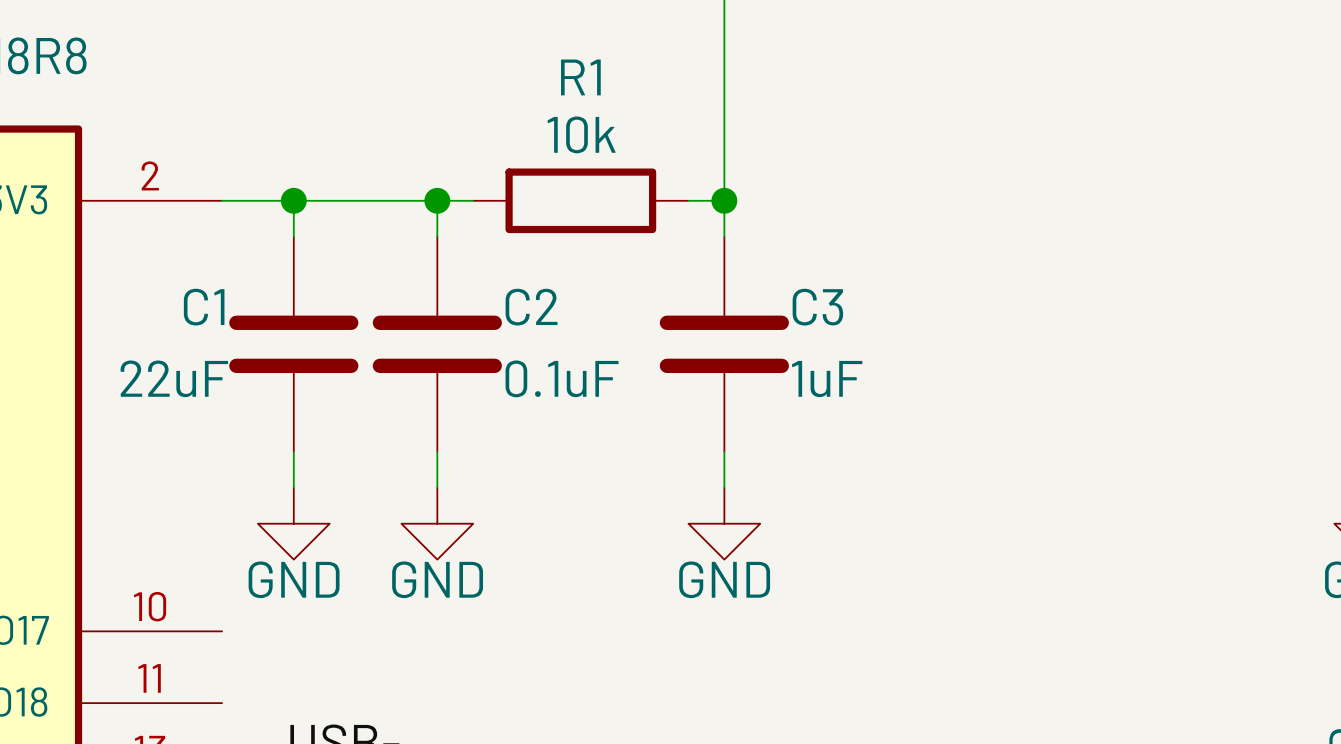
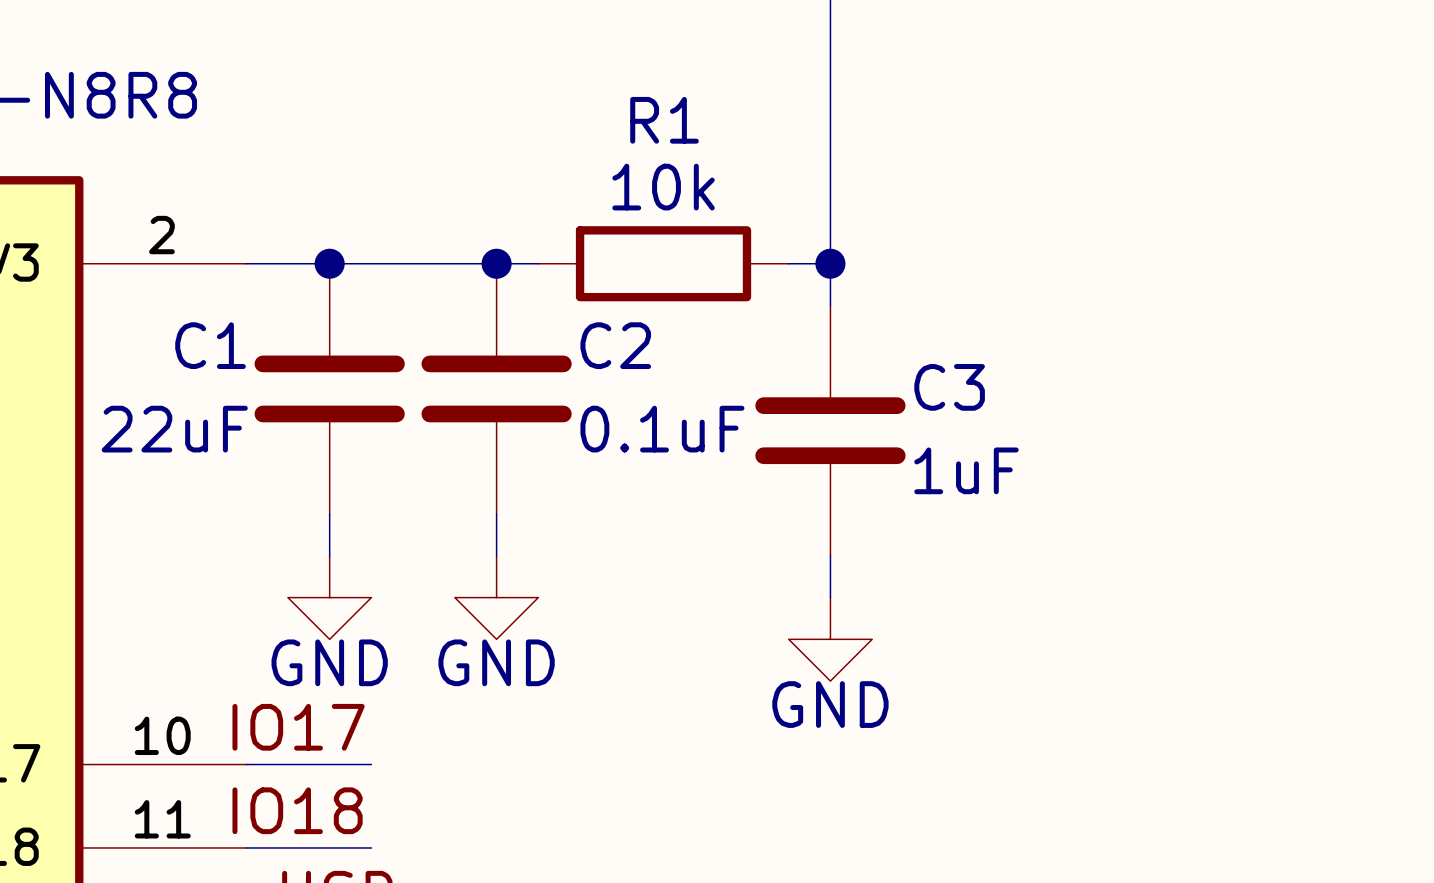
C1 position: (293, 344) -> (329, 388)
C2 position: (437, 344) -> (496, 388)
power symbol position: GND (293, 523) -> GND (329, 597)
power symbol position: GND (437, 523) -> GND (496, 597)
label: none -> IO17 (298, 727)
wire: none -> (246, 764) (371, 764)
label: none -> IO18 (297, 810)
wire: none -> (246, 847) (371, 847)

